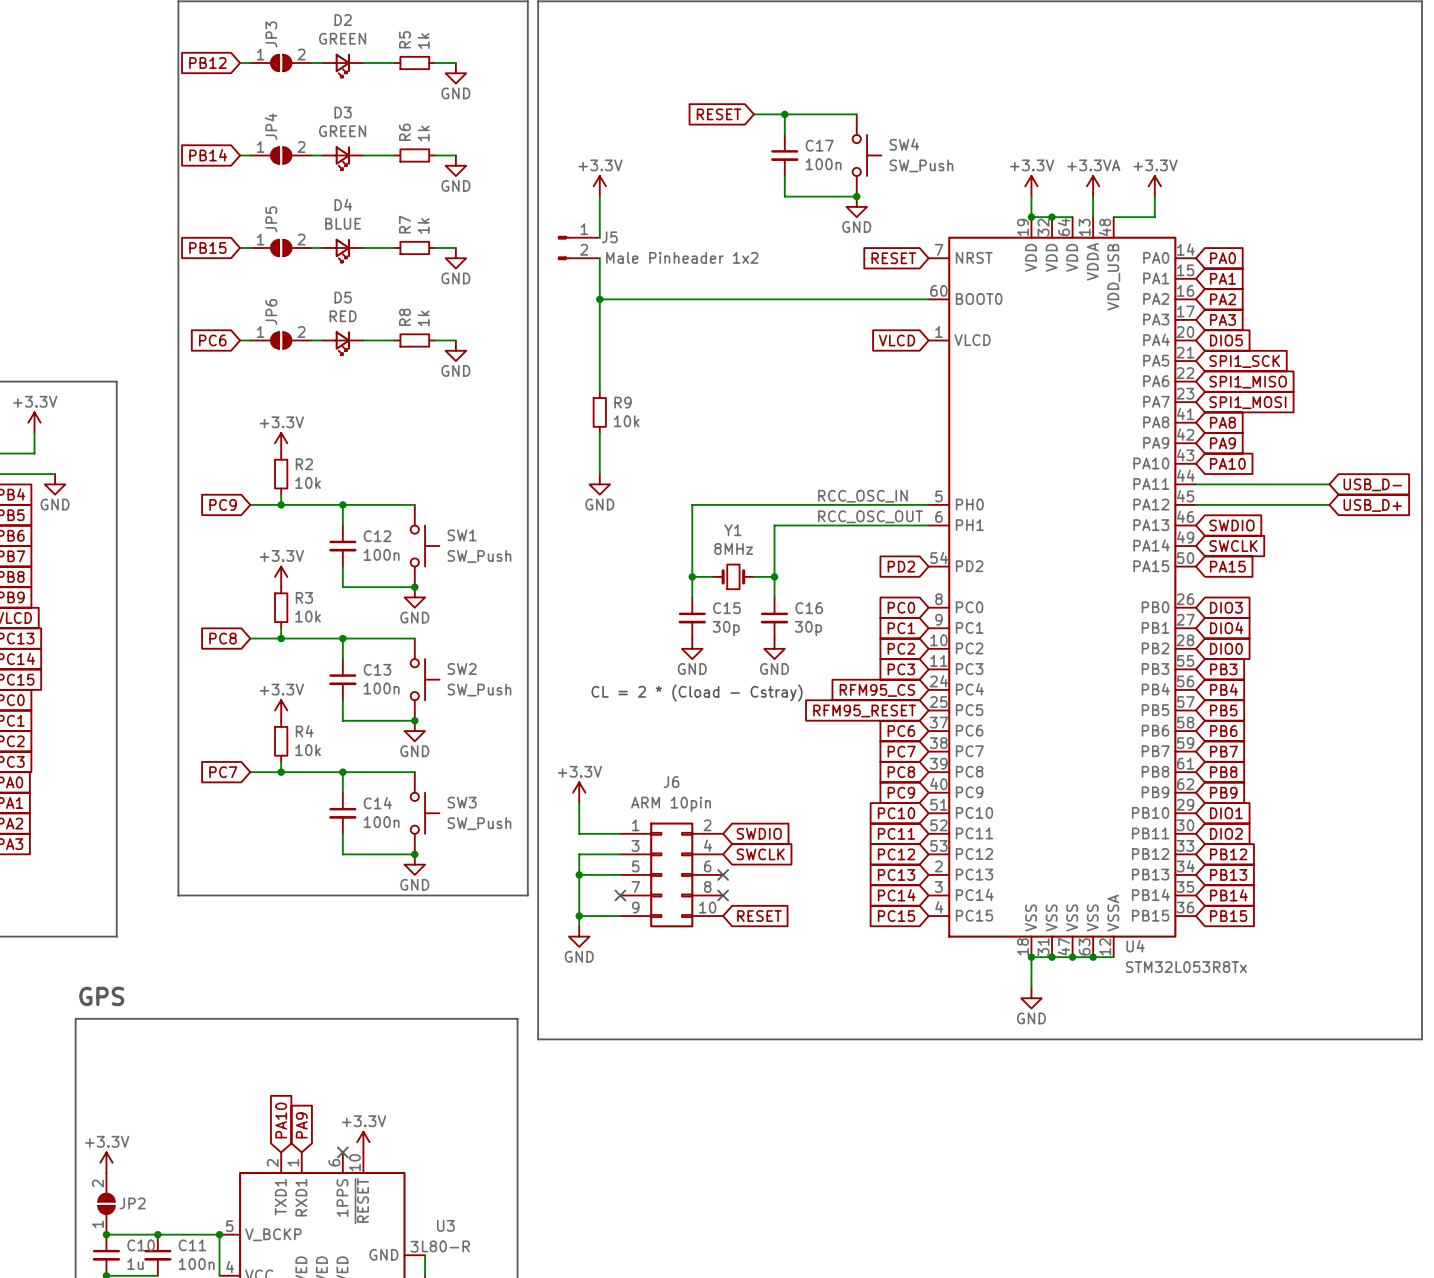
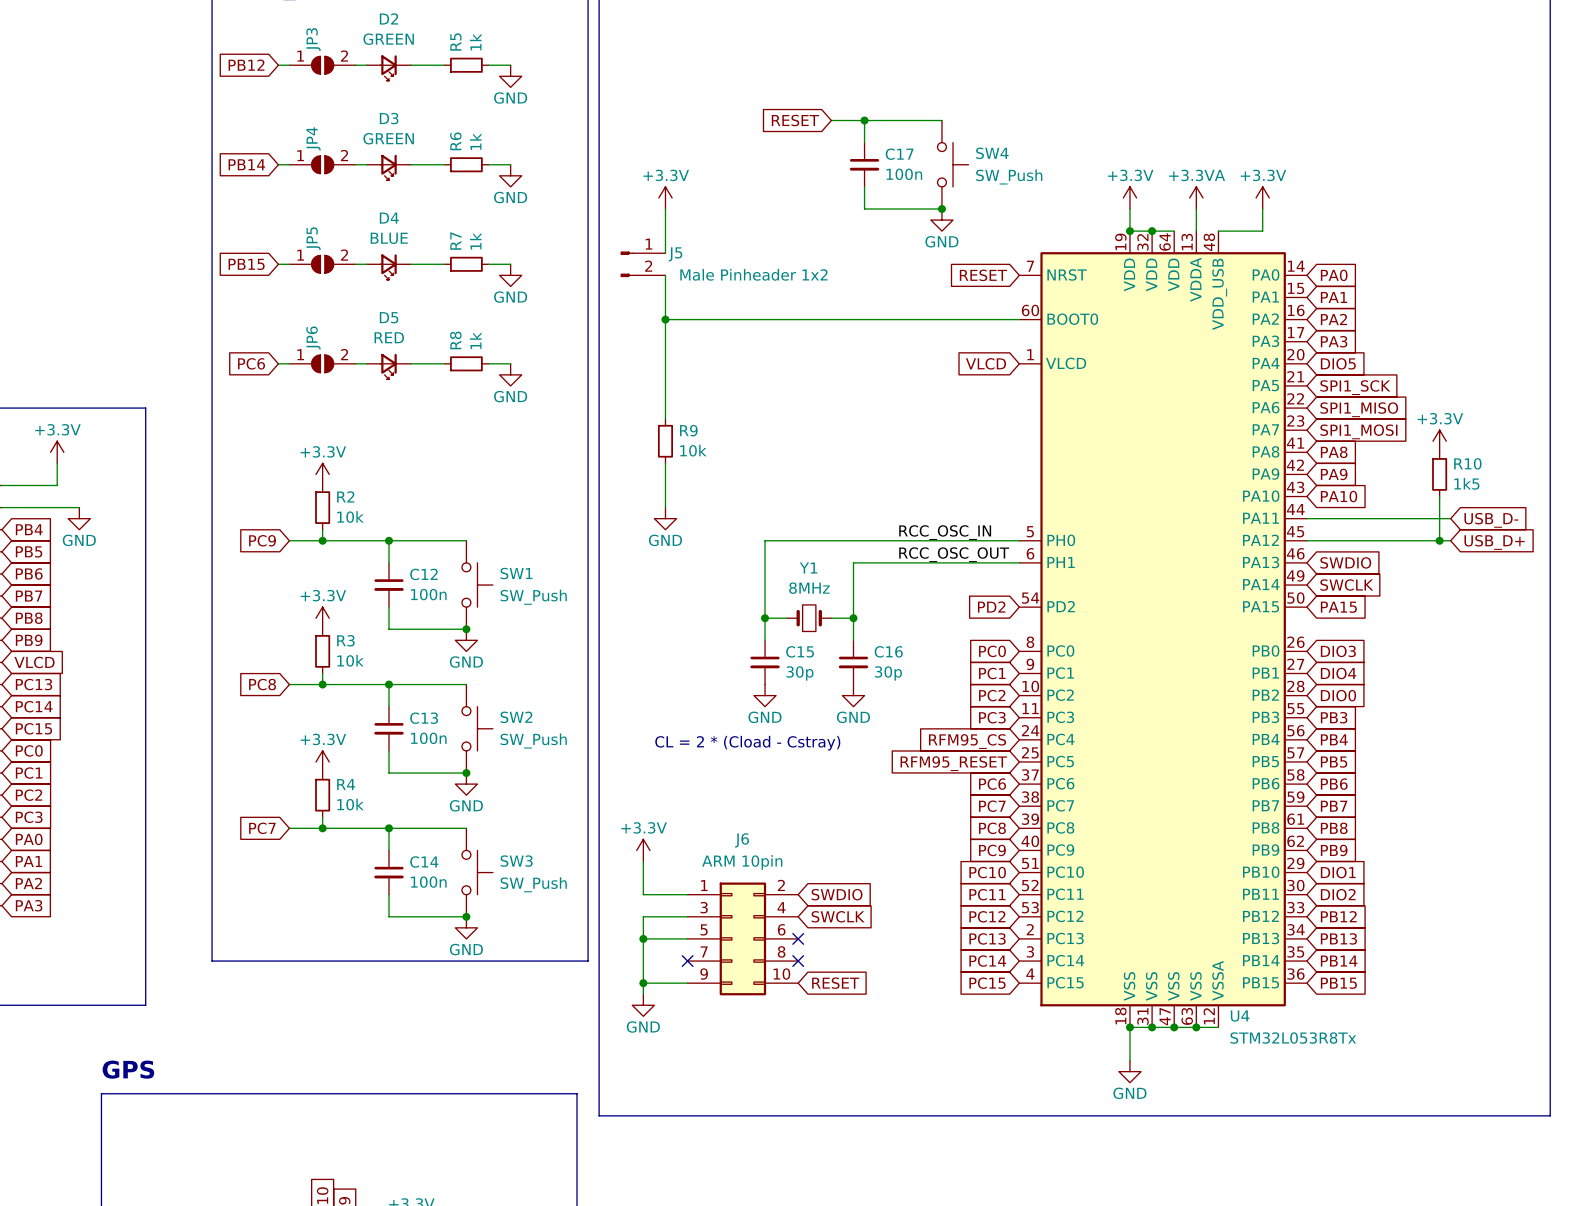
power symbol: none -> +3.3V (1439, 441)
R10: none -> 1k5 (1439, 474)
wire: none -> (1439, 496) (1439, 540)
junction: none -> (1439, 540)

